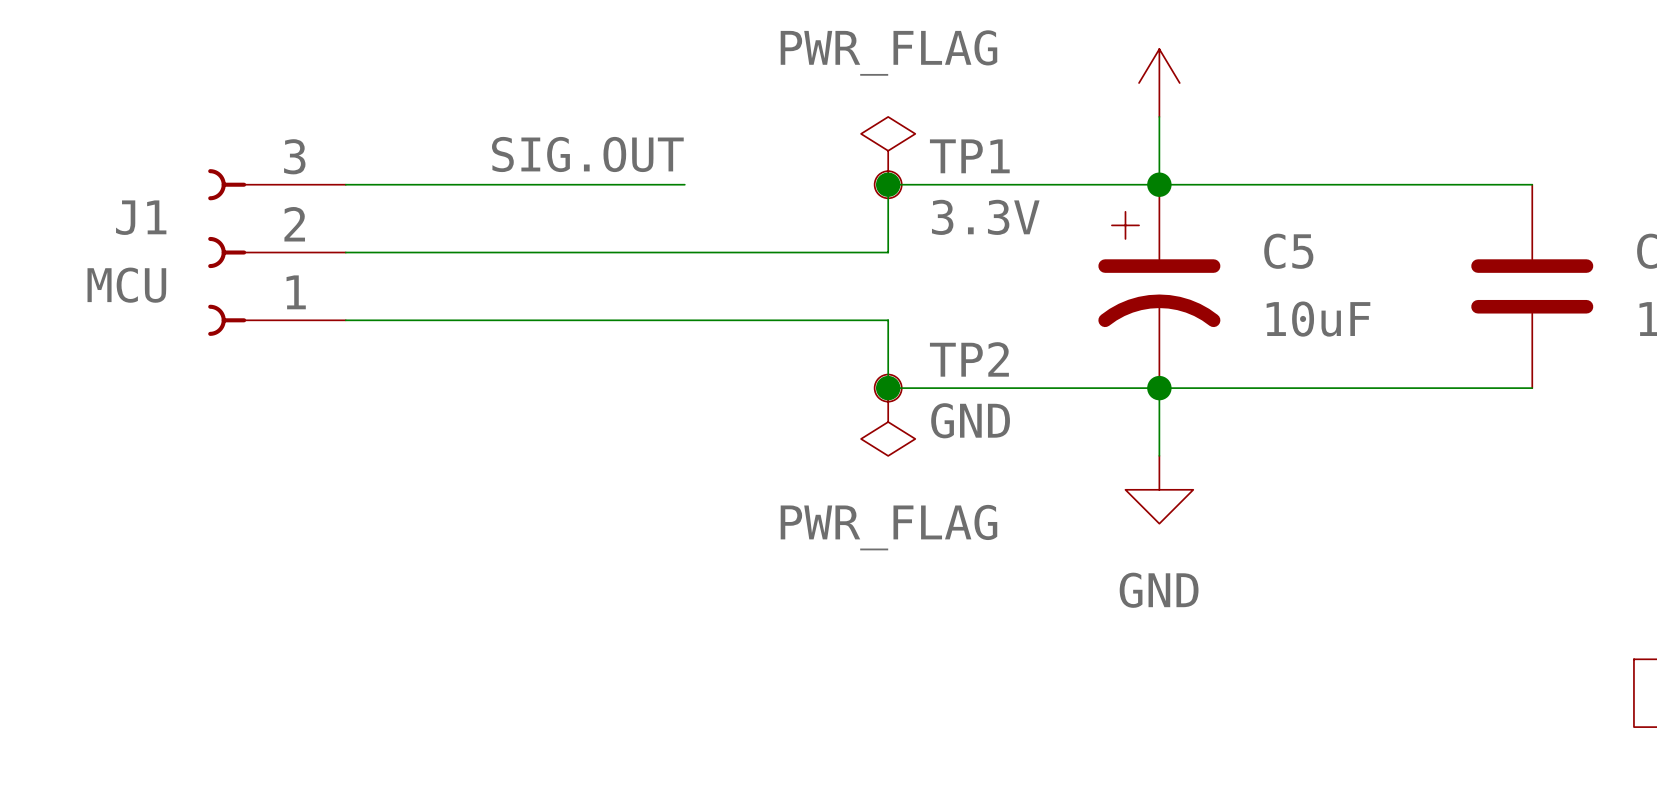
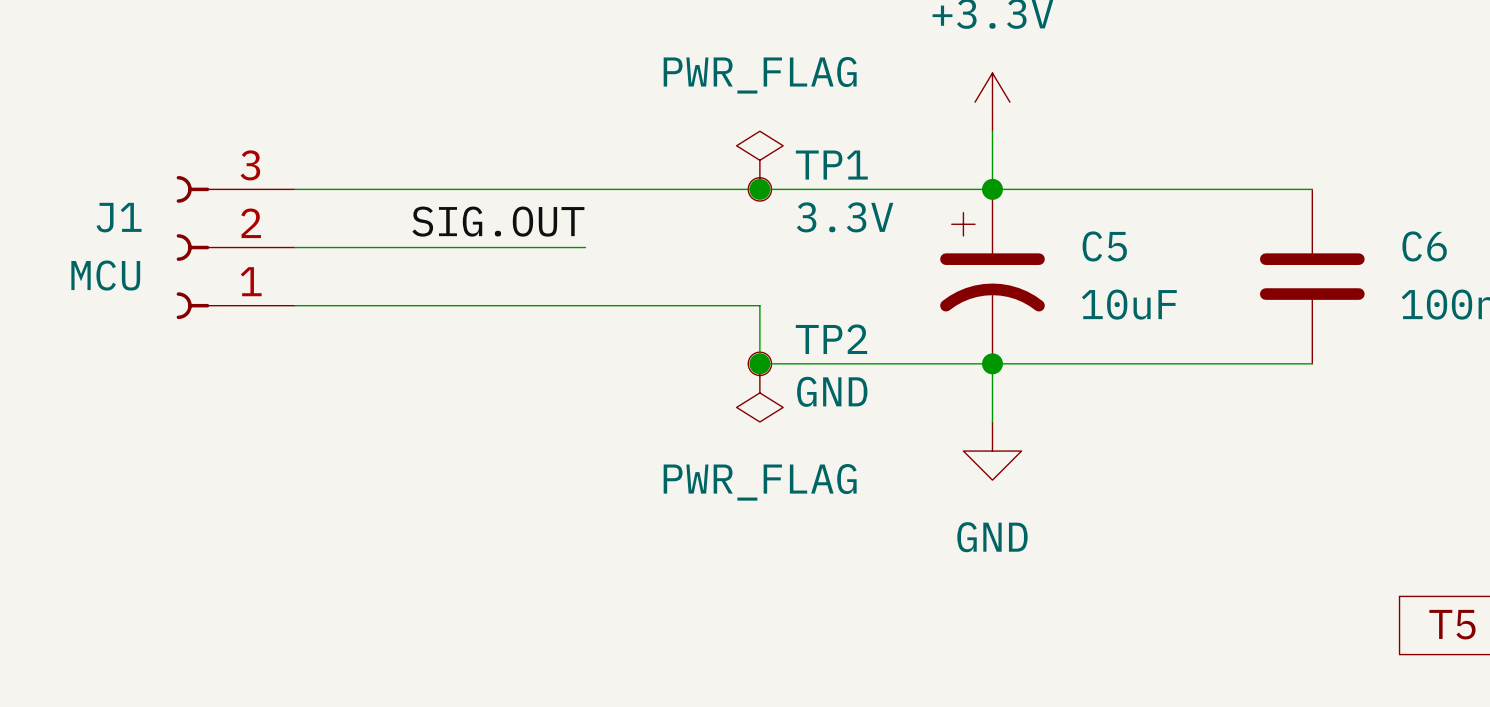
label position: SIG.OUT (587, 154) -> SIG.OUT (498, 221)
wire: (888, 184) (888, 252) (684, 252) -> (759, 189) (585, 189)

